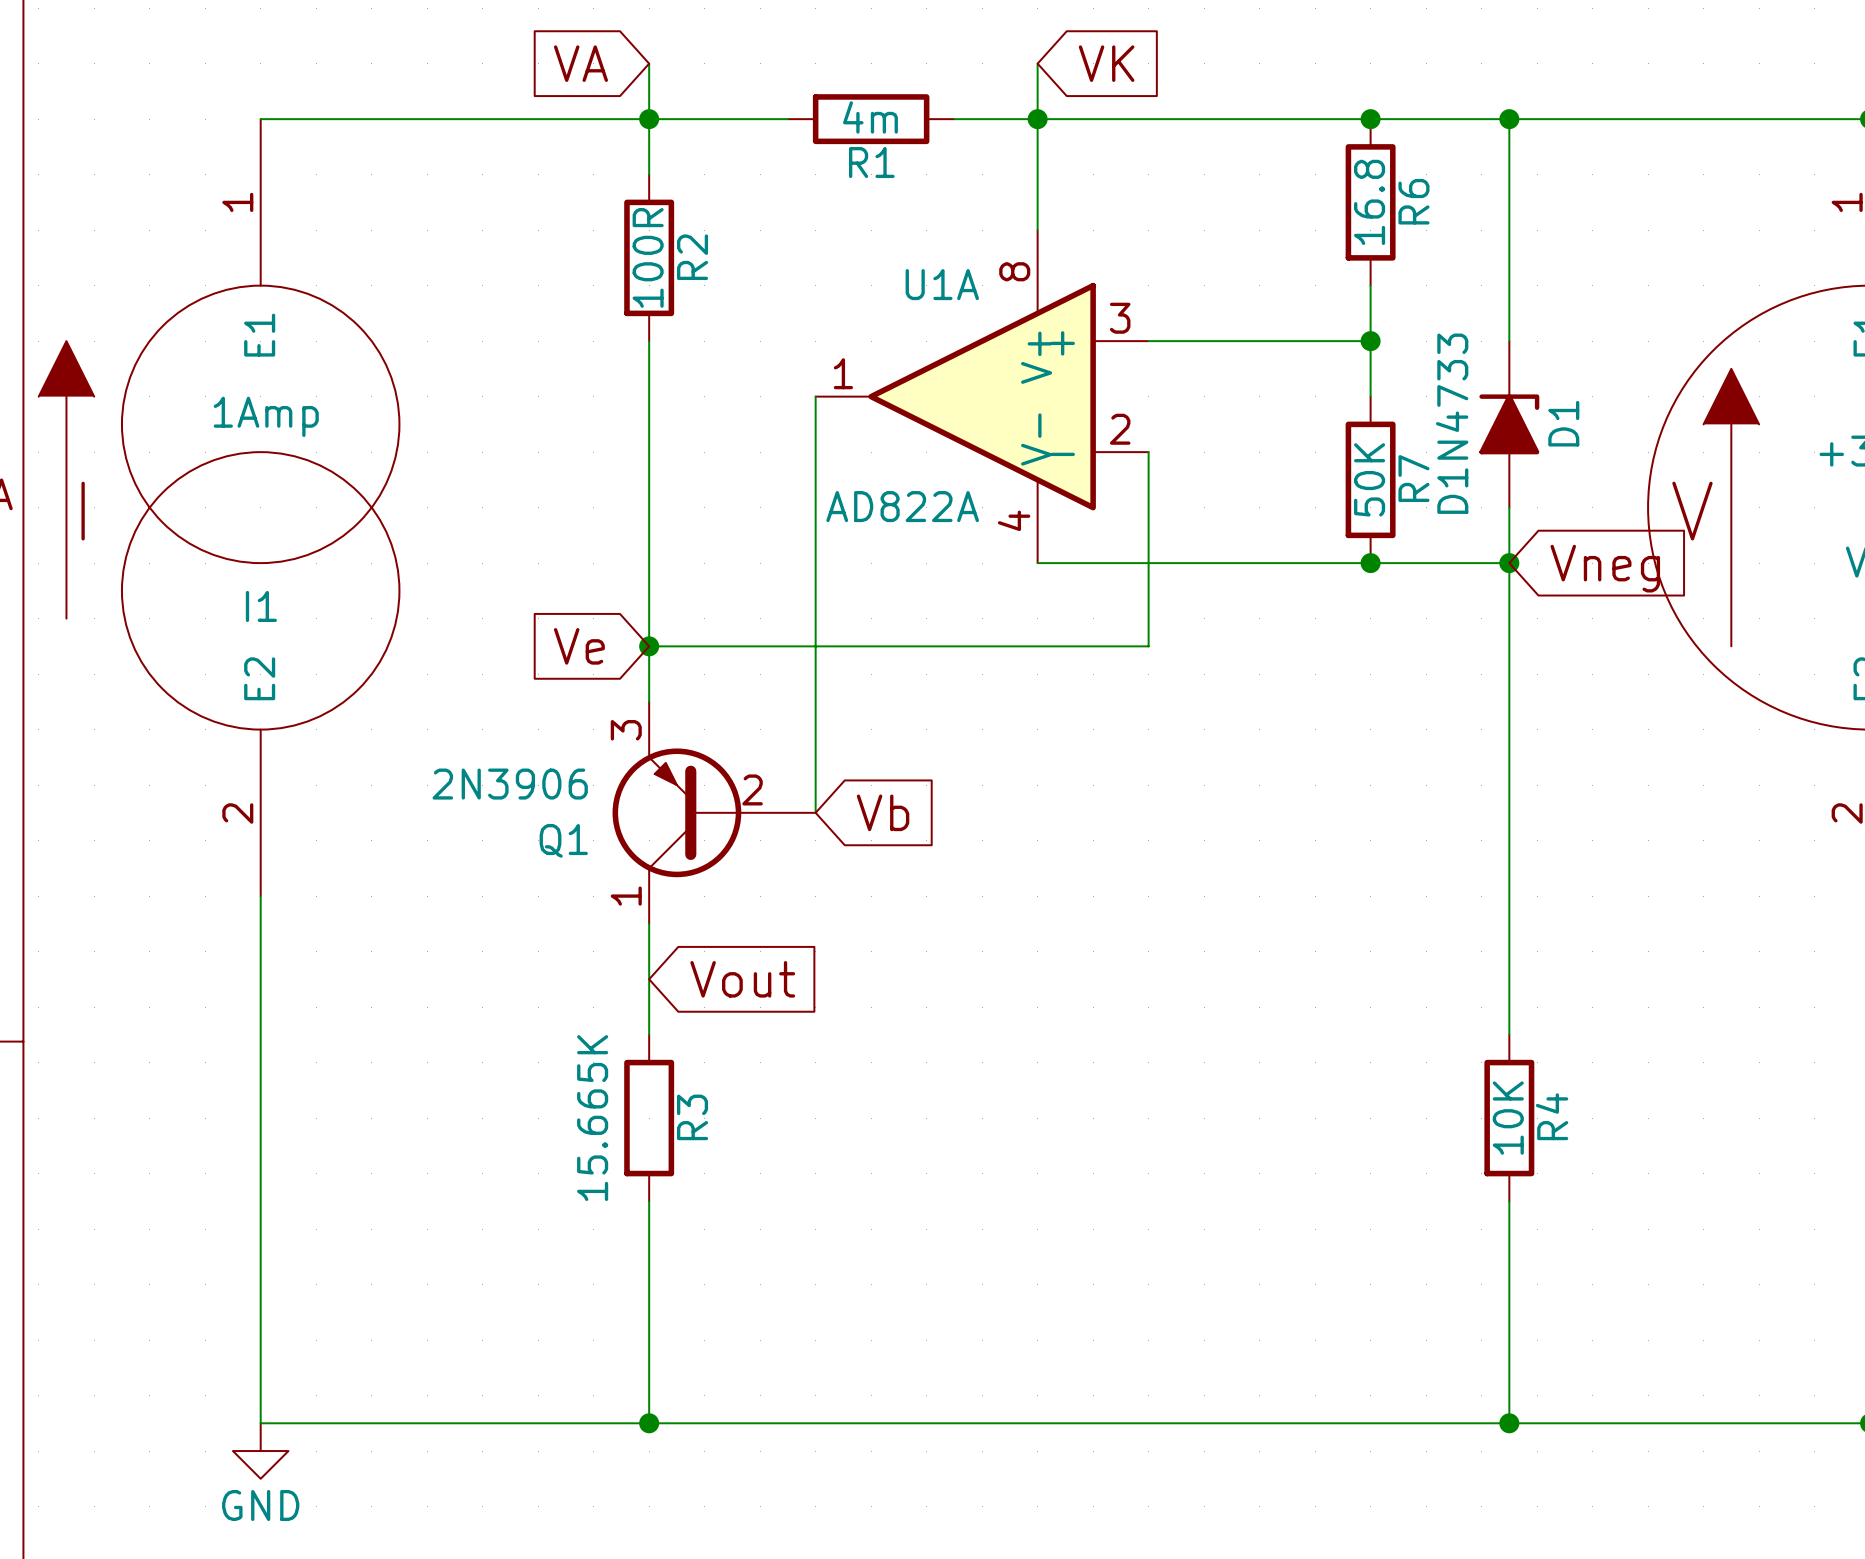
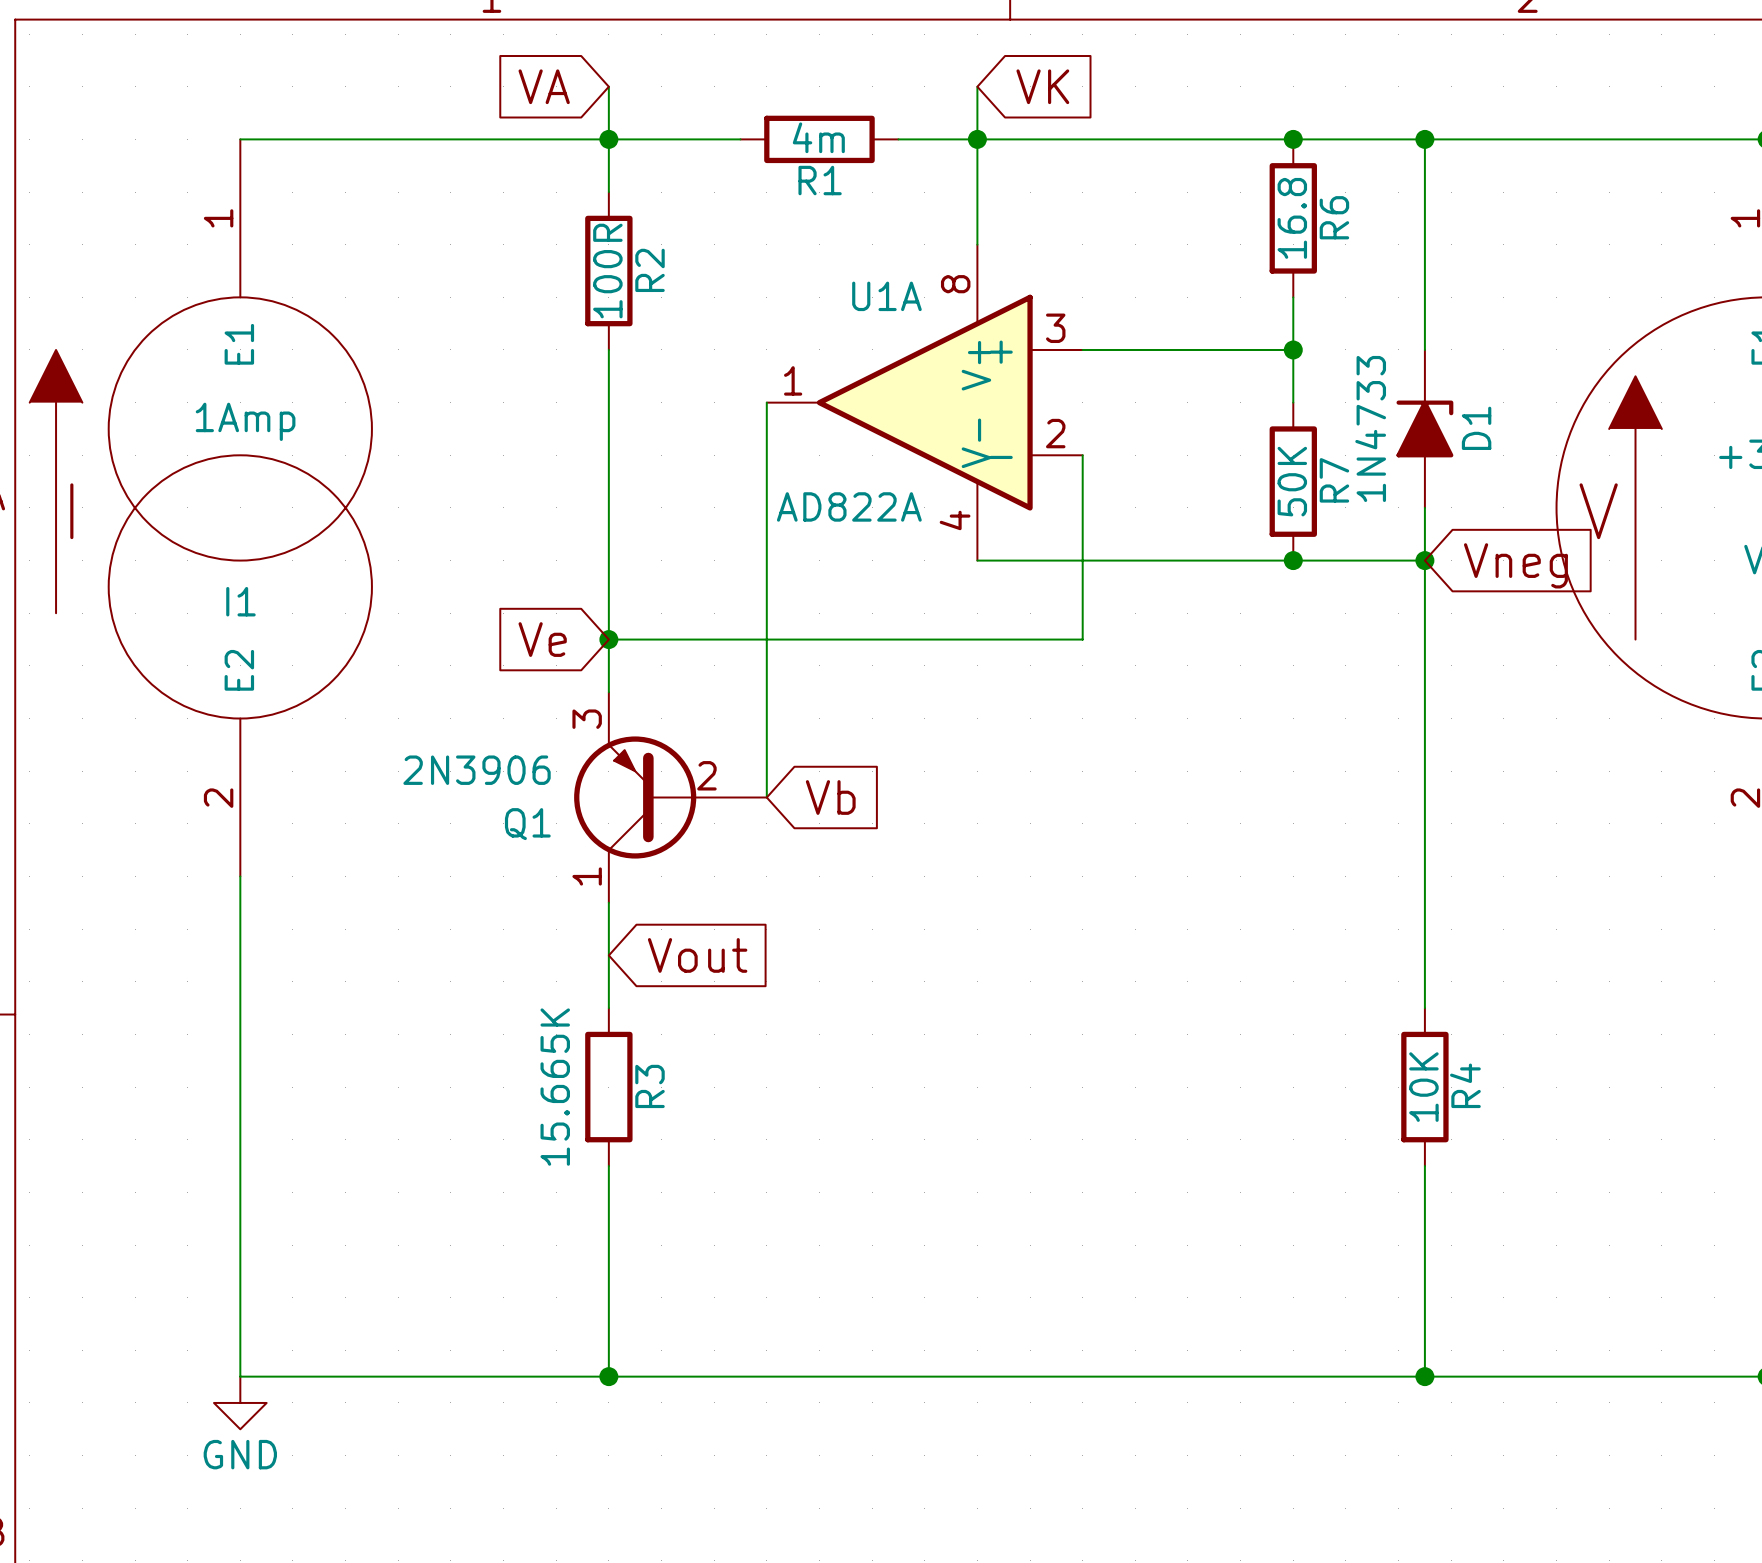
D1 value: D1N4733 (1452, 423) -> 1N4733 (1370, 428)

